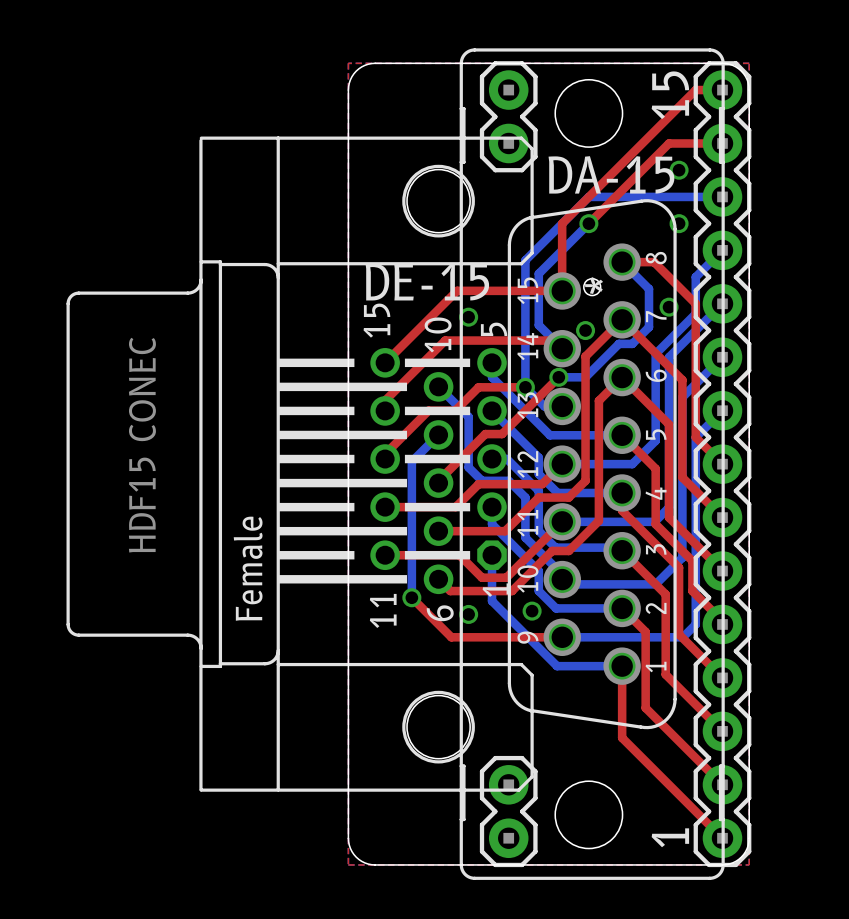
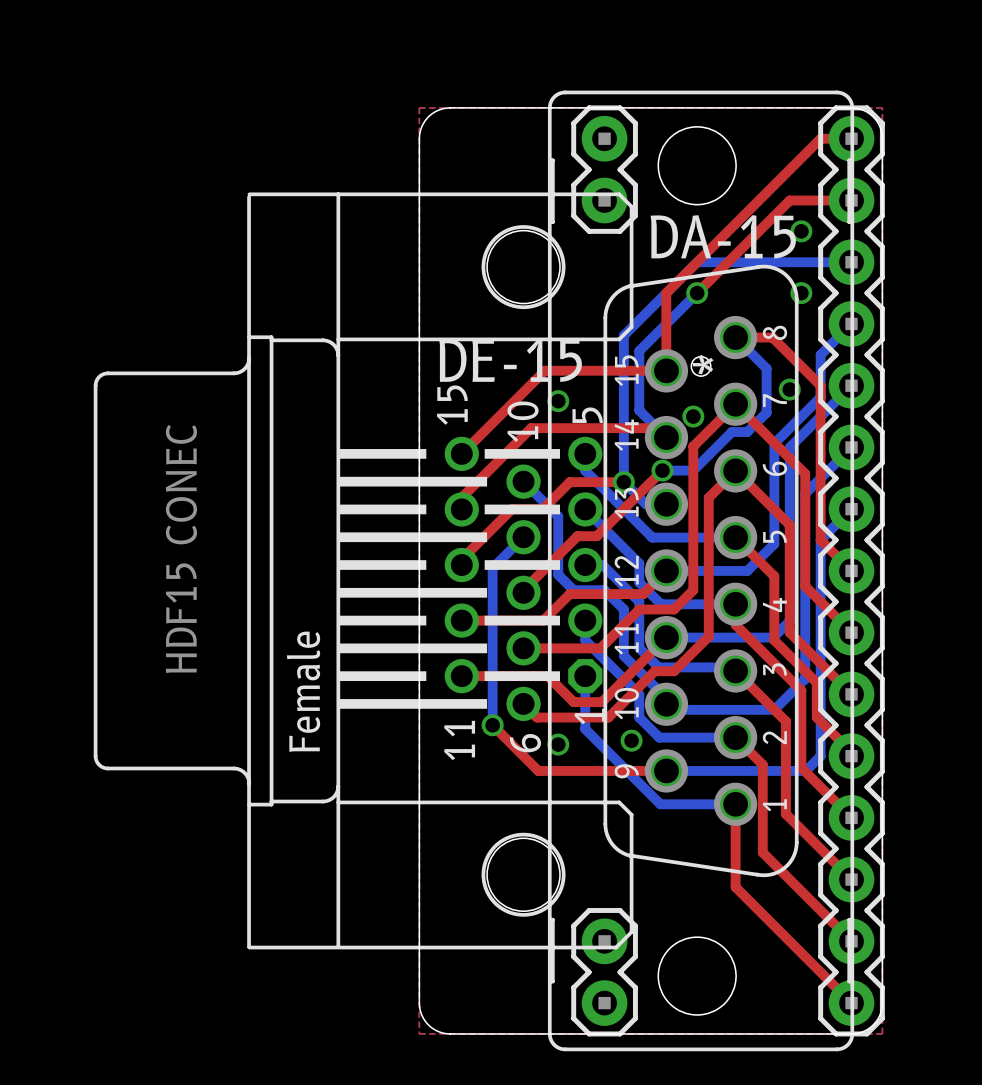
text: 15 (670, 95) -> none
text: 1 (670, 837) -> none

